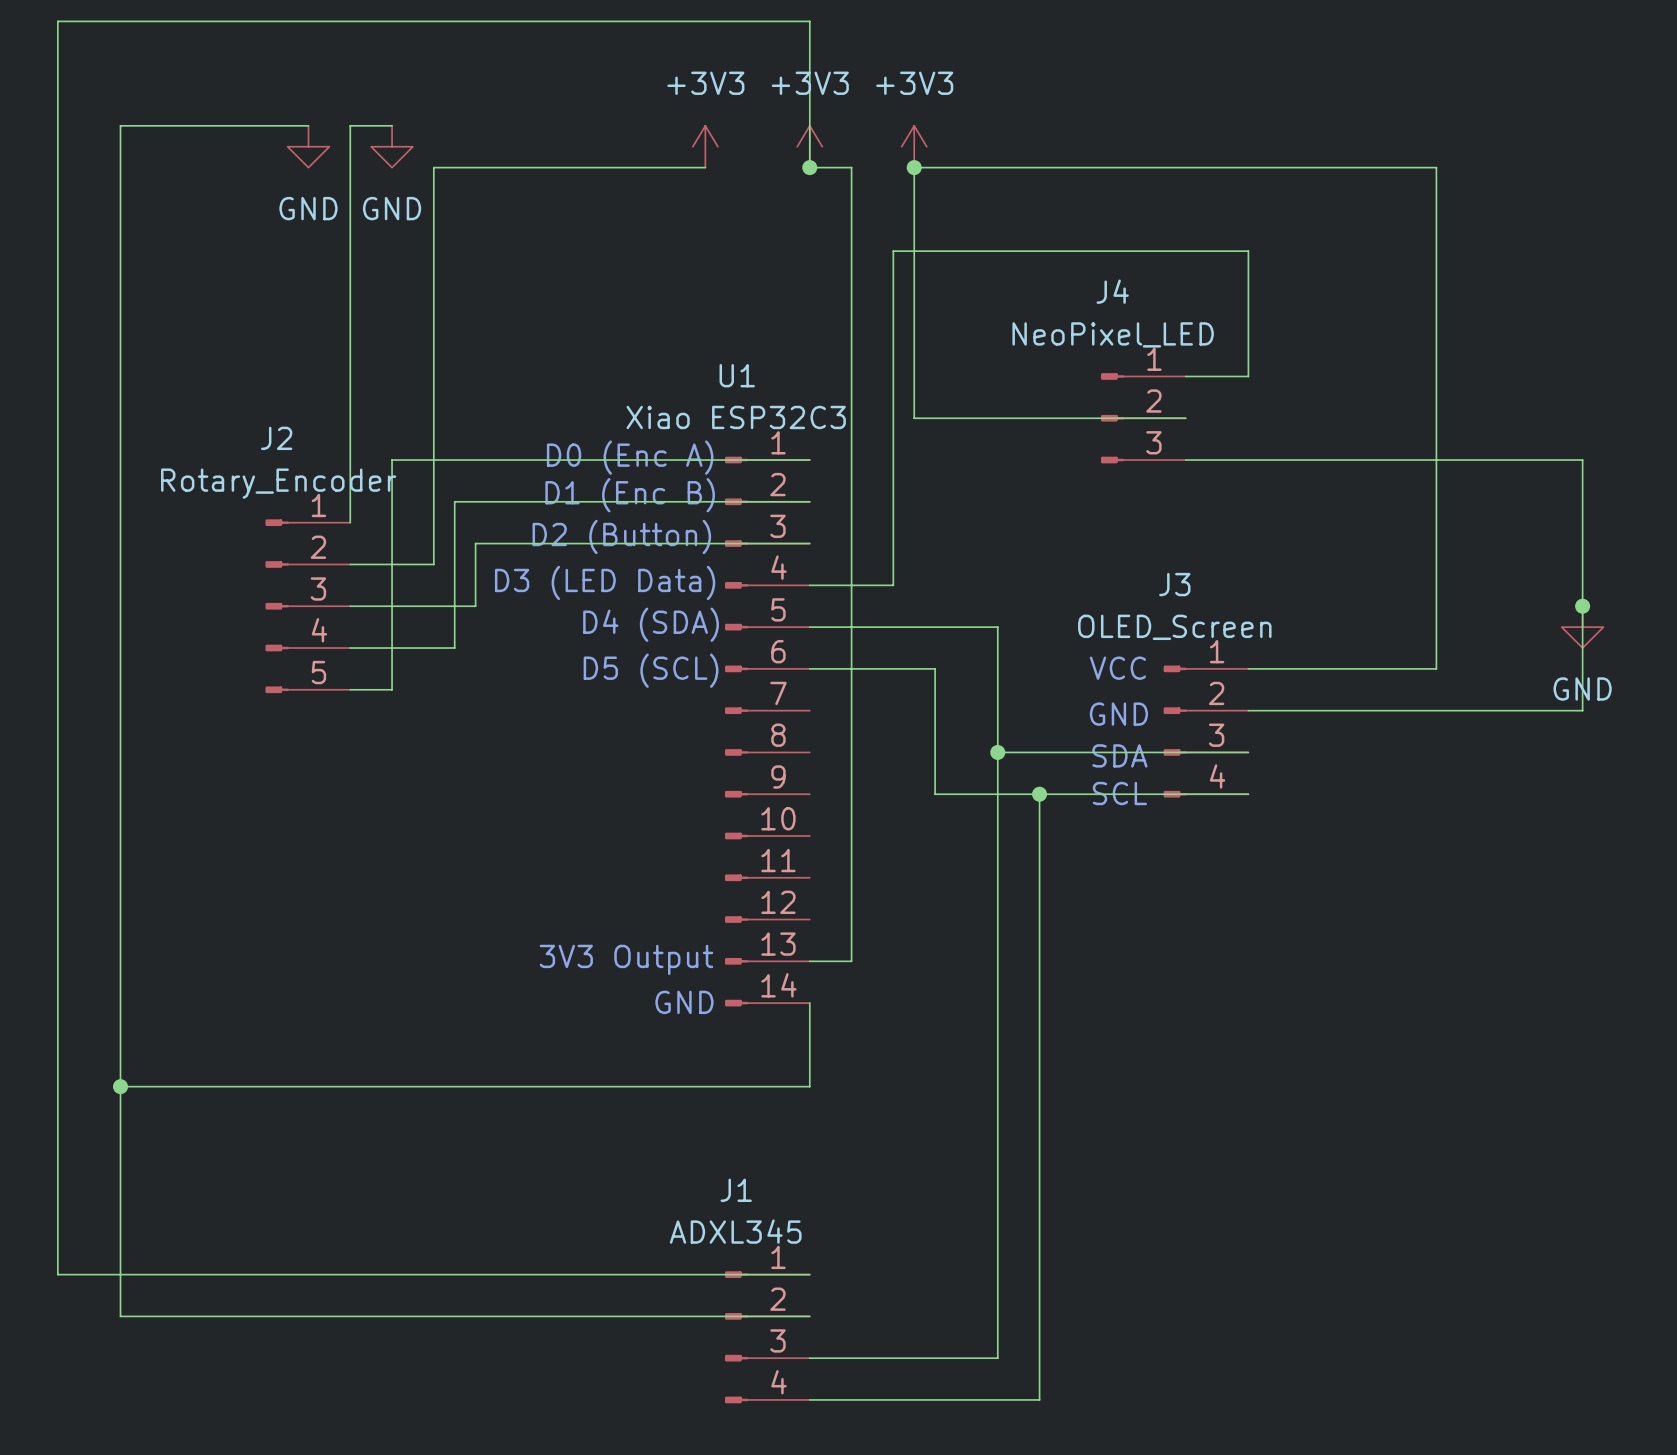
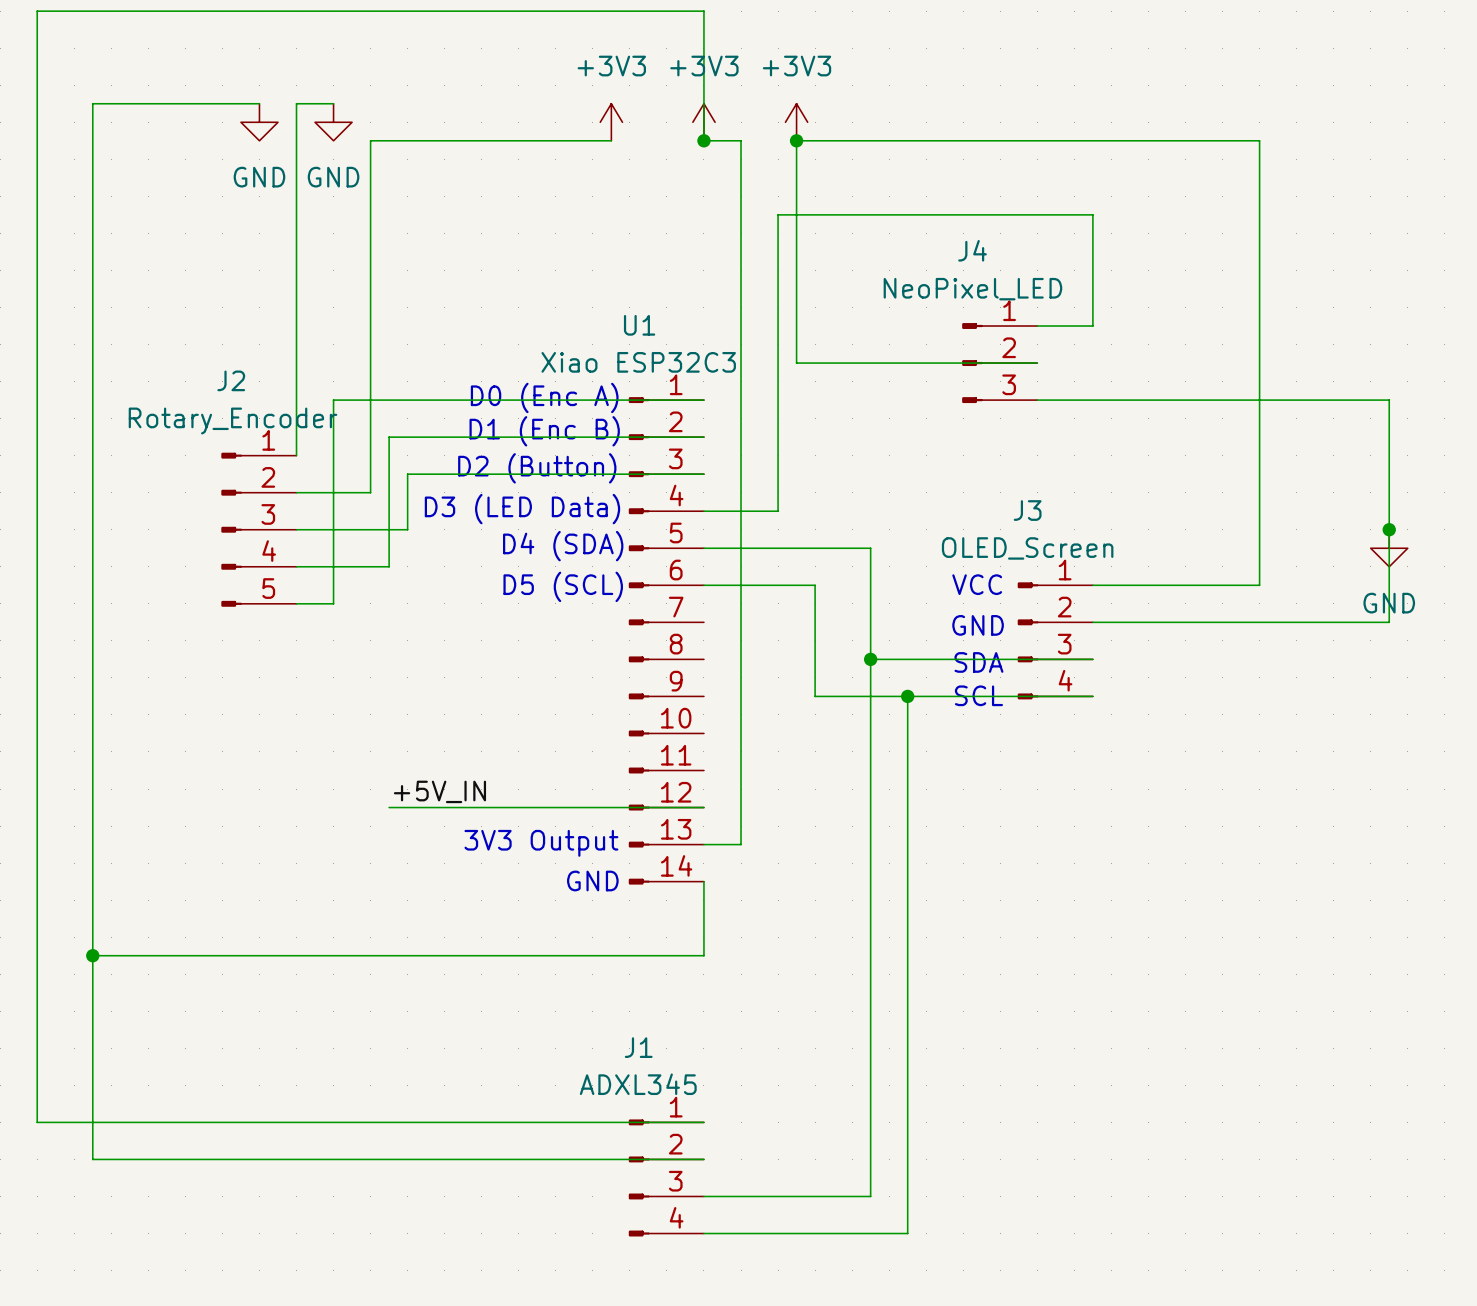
label: none -> +5V_IN (439, 791)
wire: none -> (389, 807) (703, 807)

